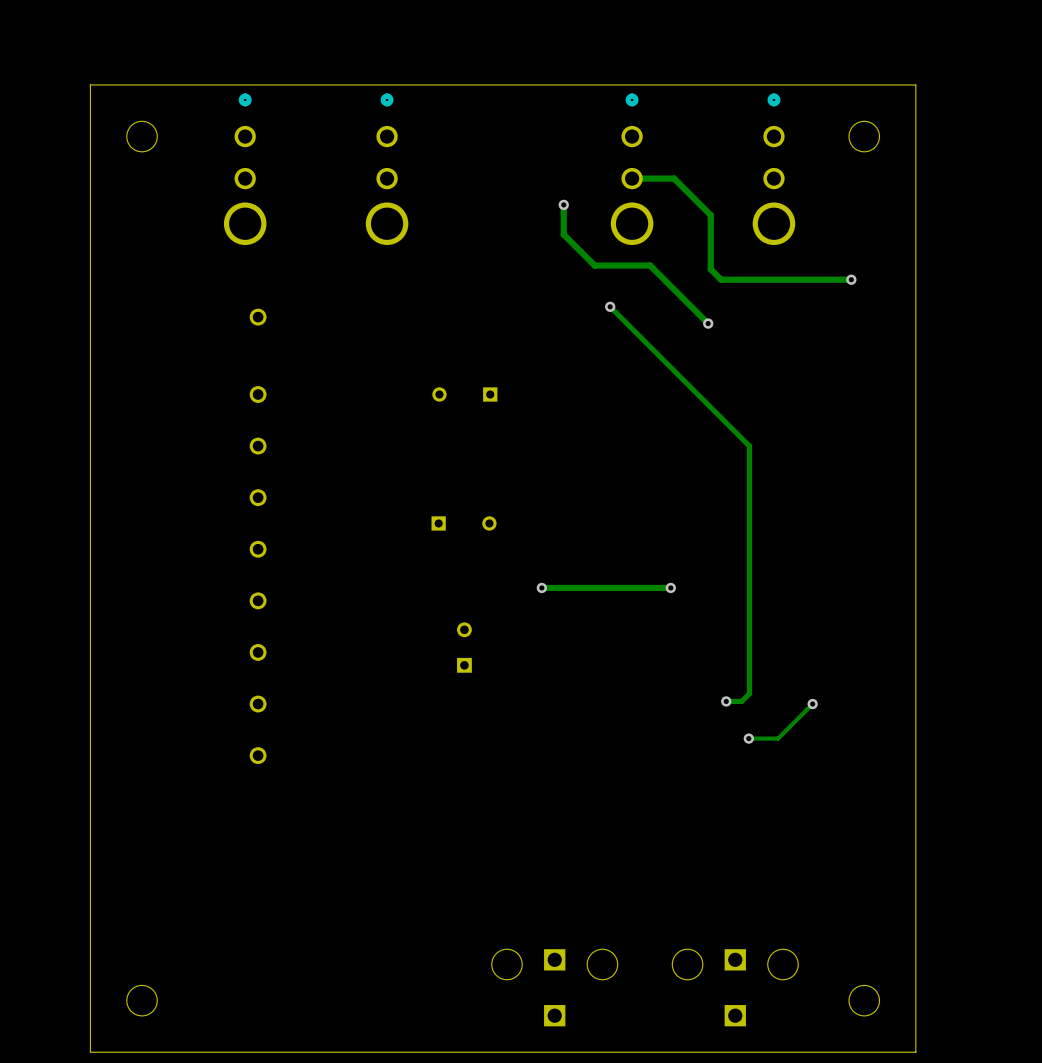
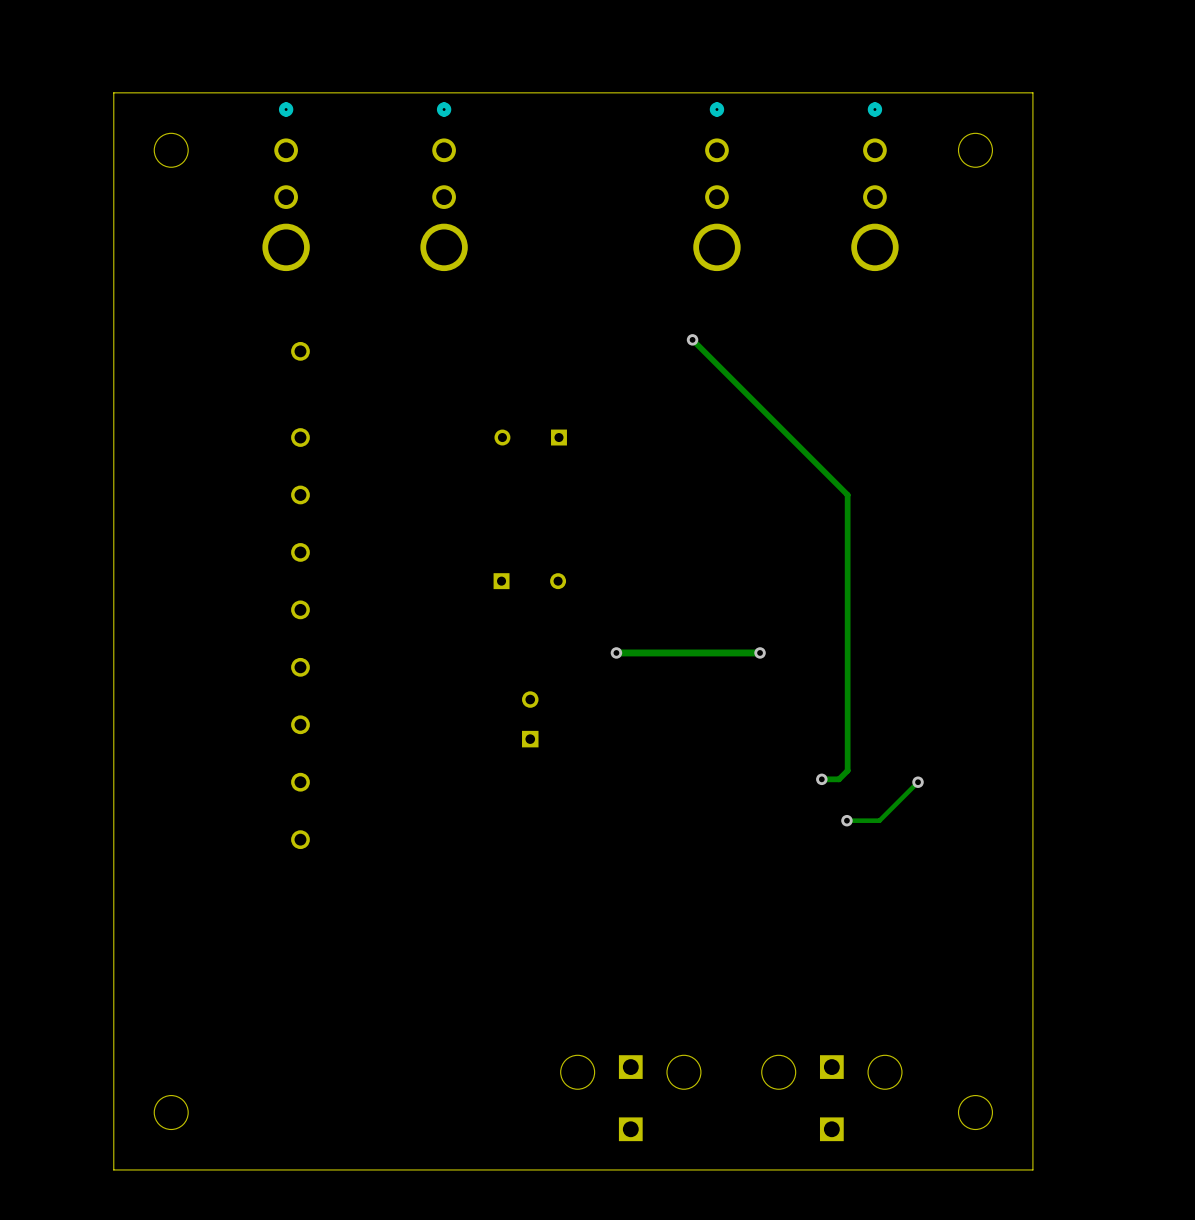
track: (632, 178) (674, 178) (710, 215) (710, 269) (721, 279) (851, 279) -> none
track: (563, 204) (563, 234) (594, 265) (650, 265) (708, 323) -> none
via: (563, 204) -> none
via: (851, 279) -> none
via: (708, 323) -> none

